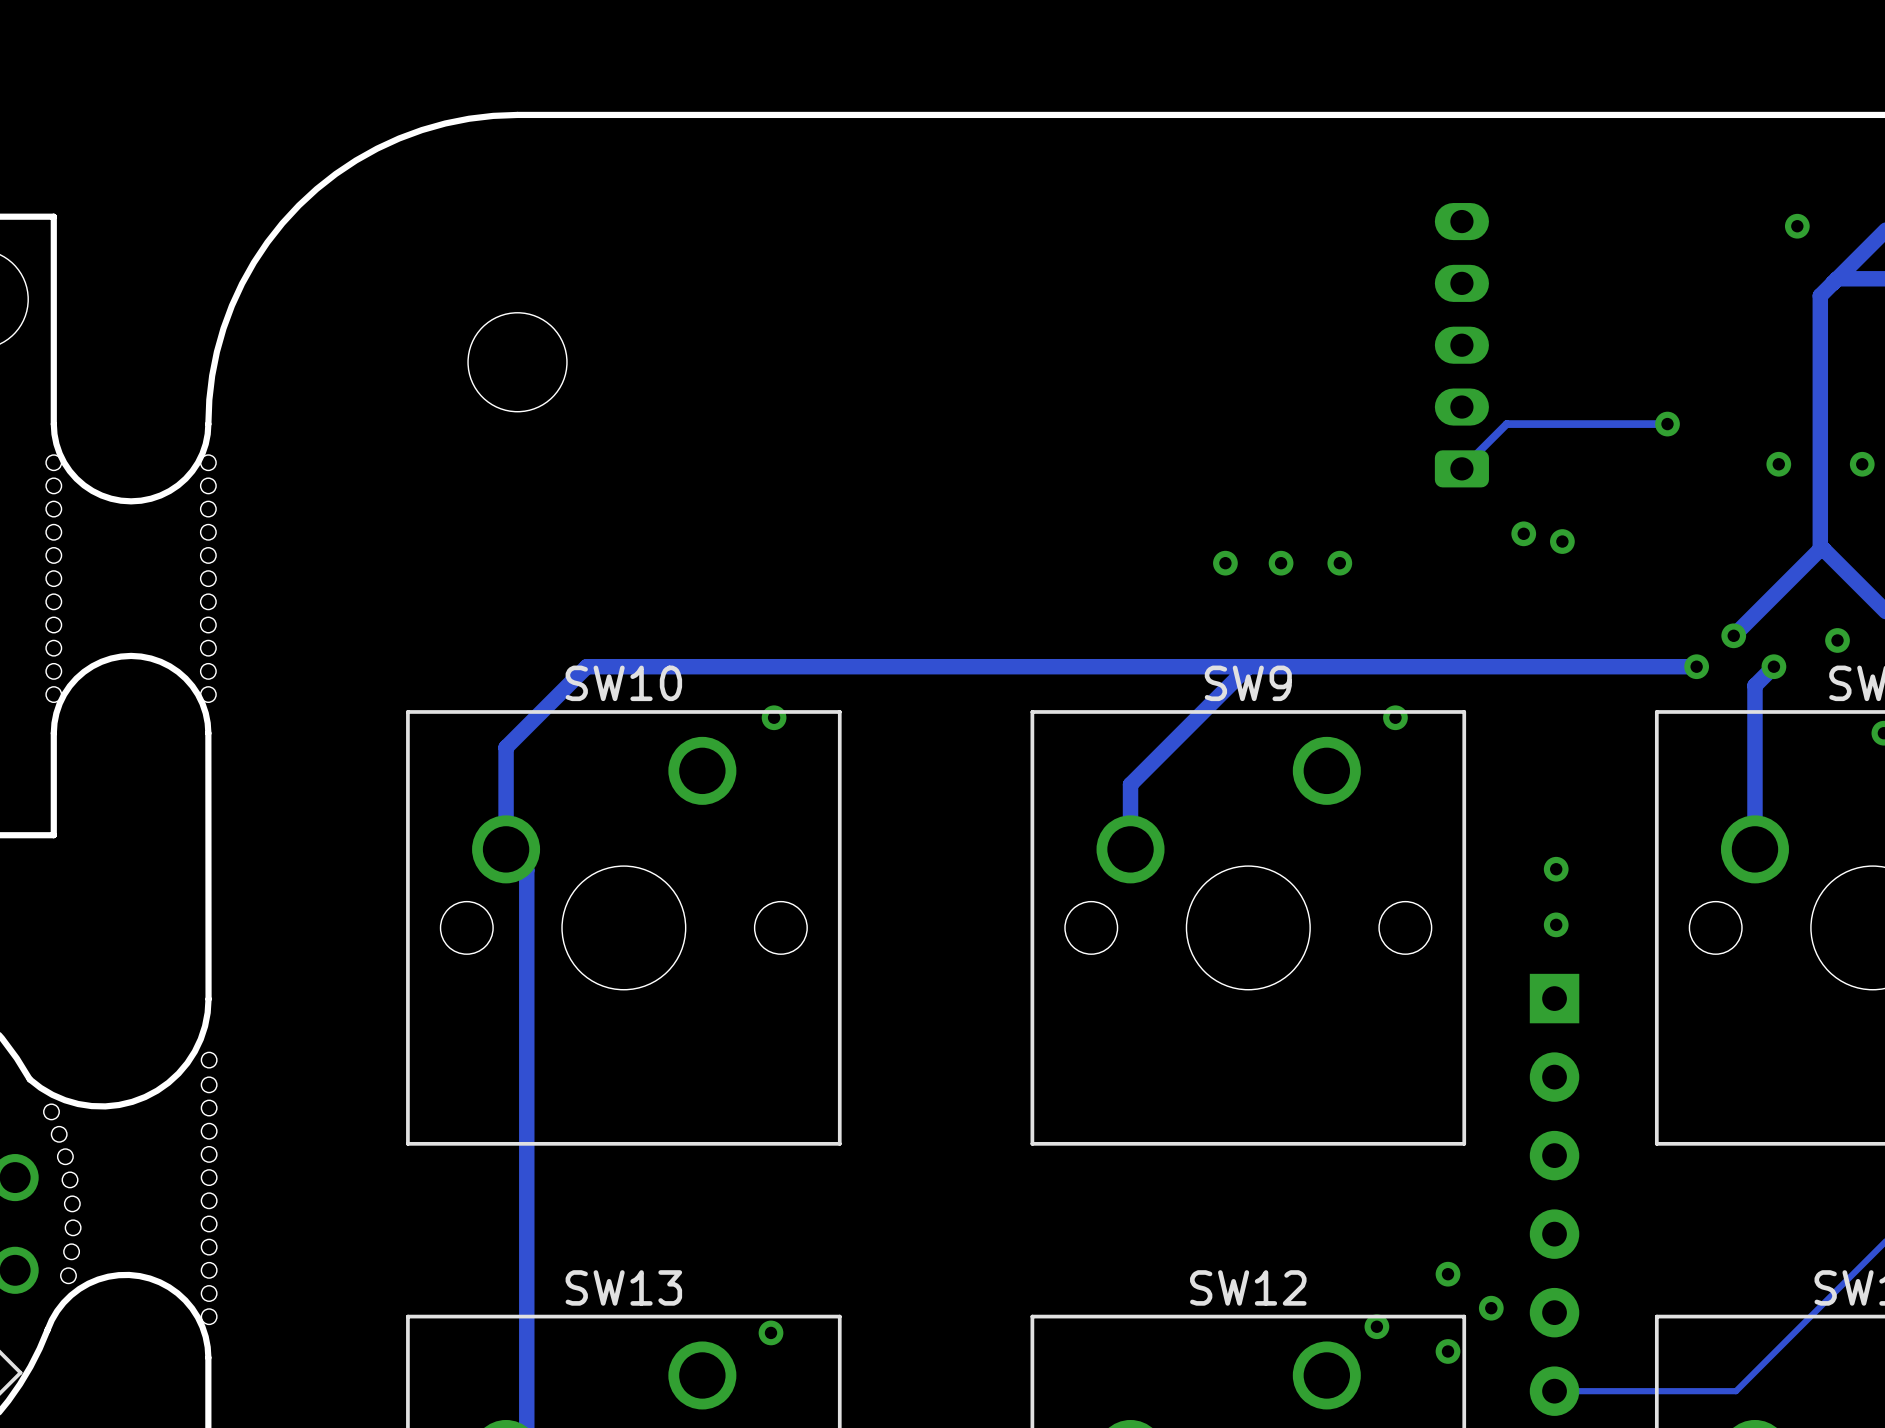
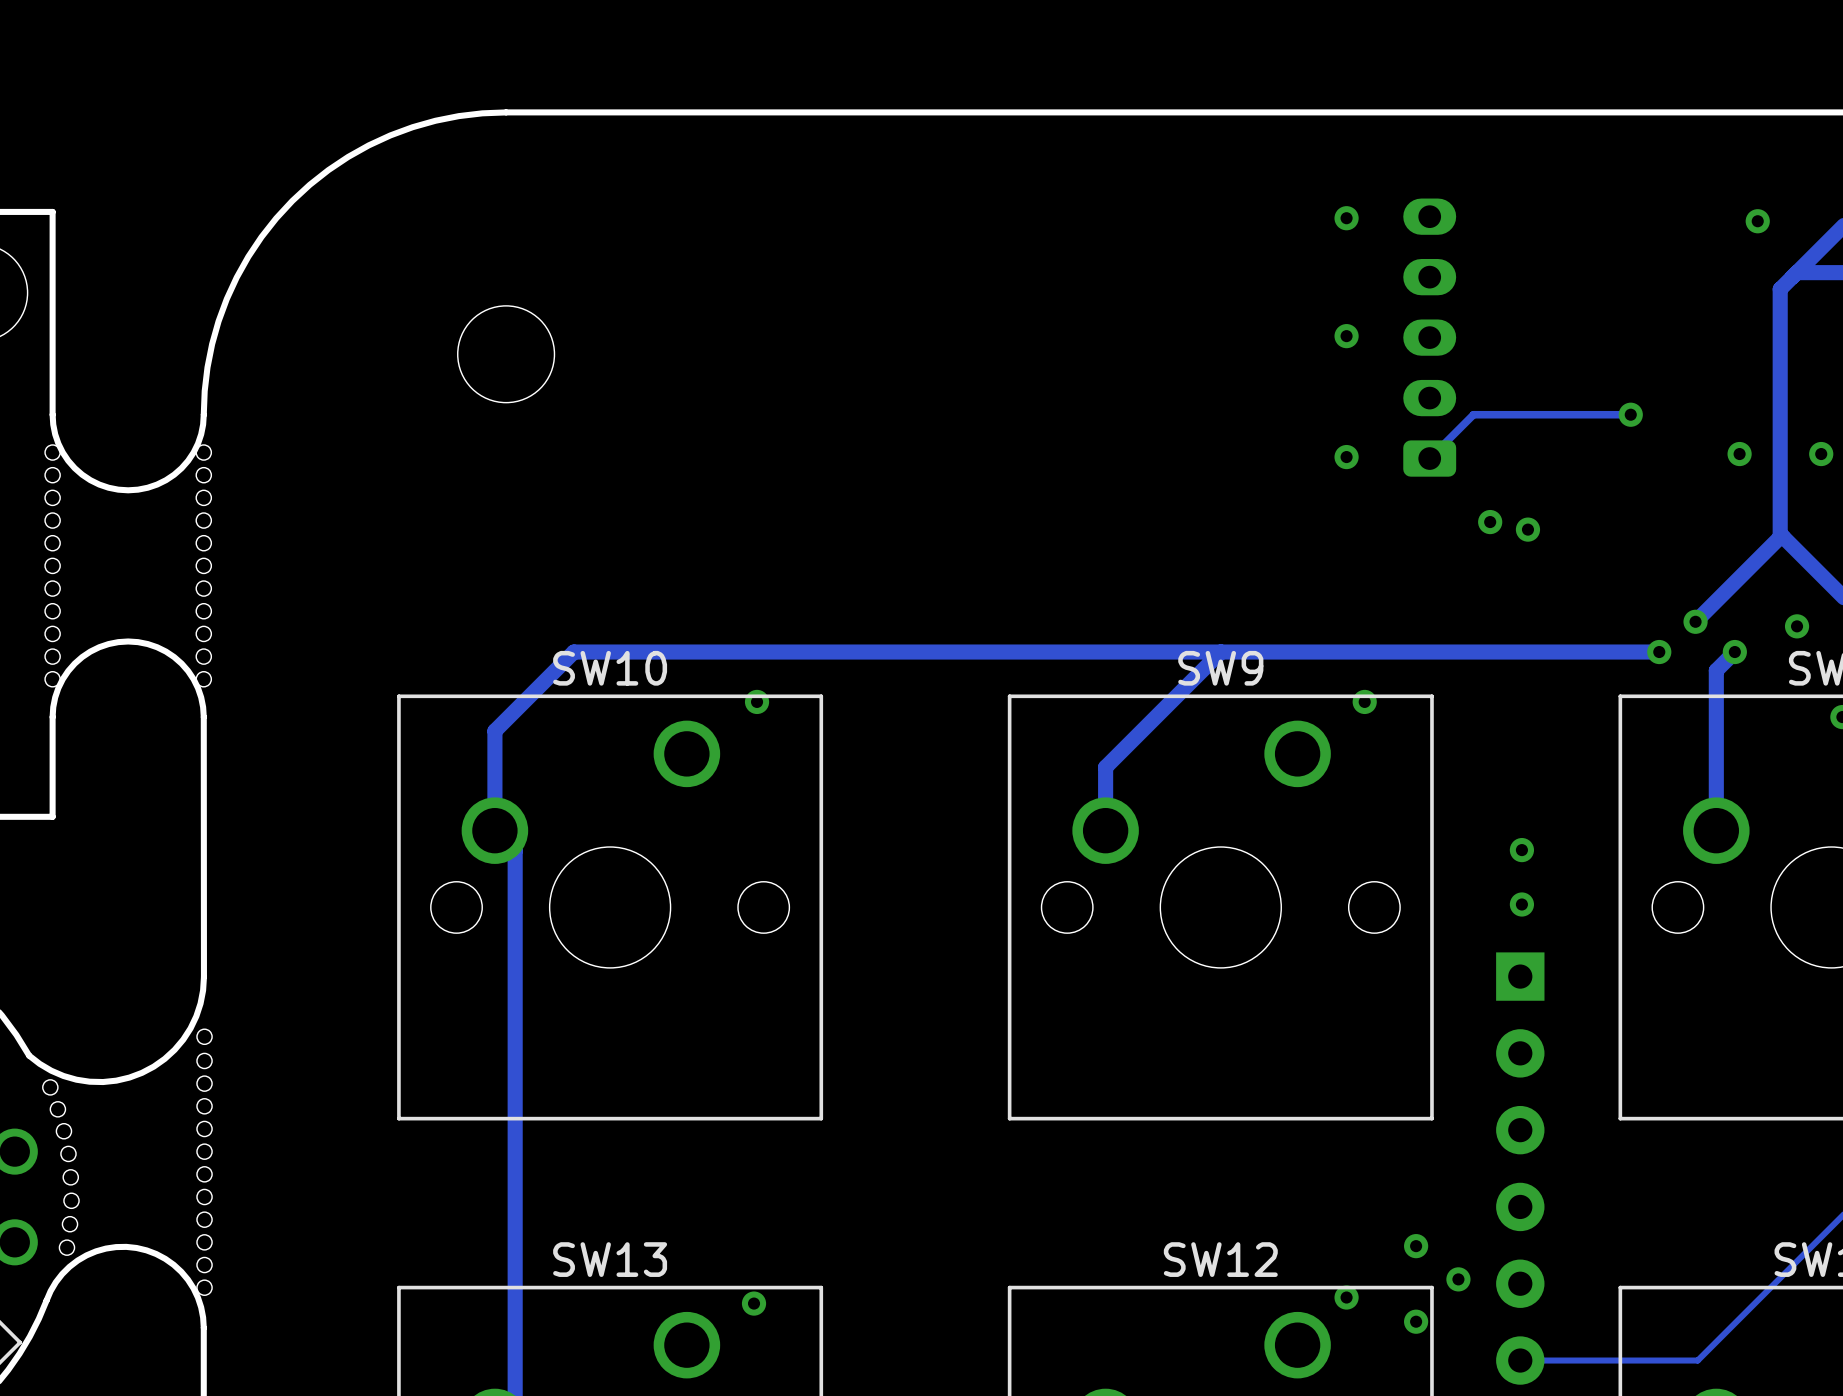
via: none -> (1346, 218)
via: none -> (1346, 336)
via: none -> (1346, 457)
via: (1225, 563) -> none
via: (1281, 563) -> none
via: (1339, 563) -> none

